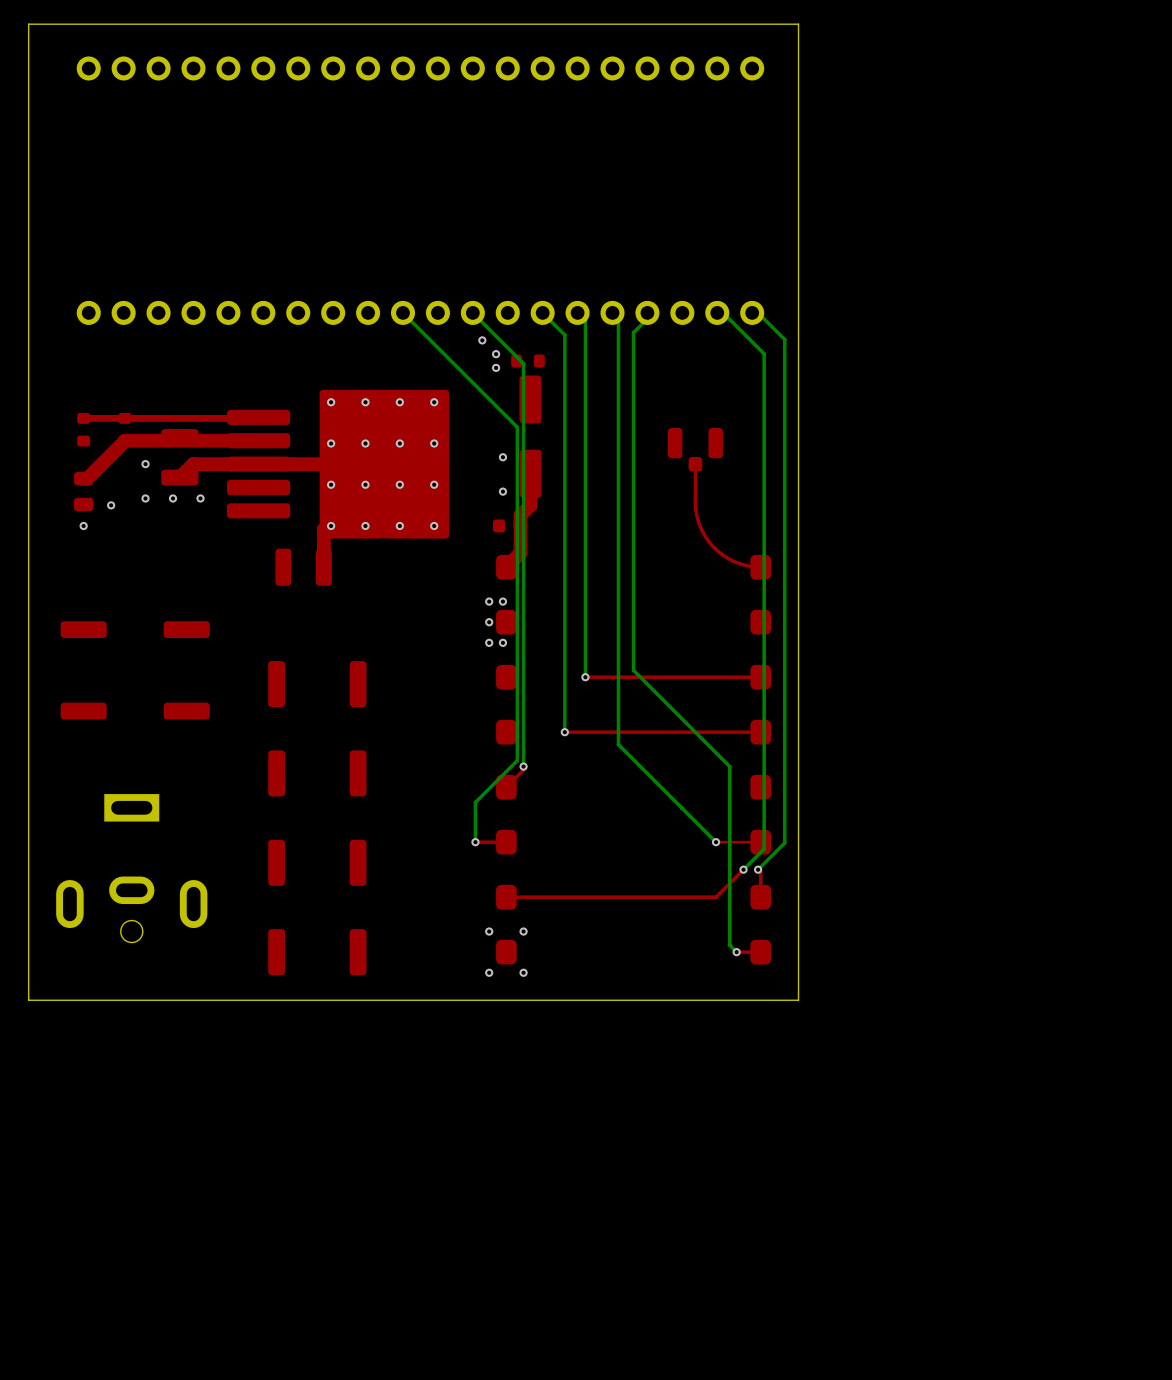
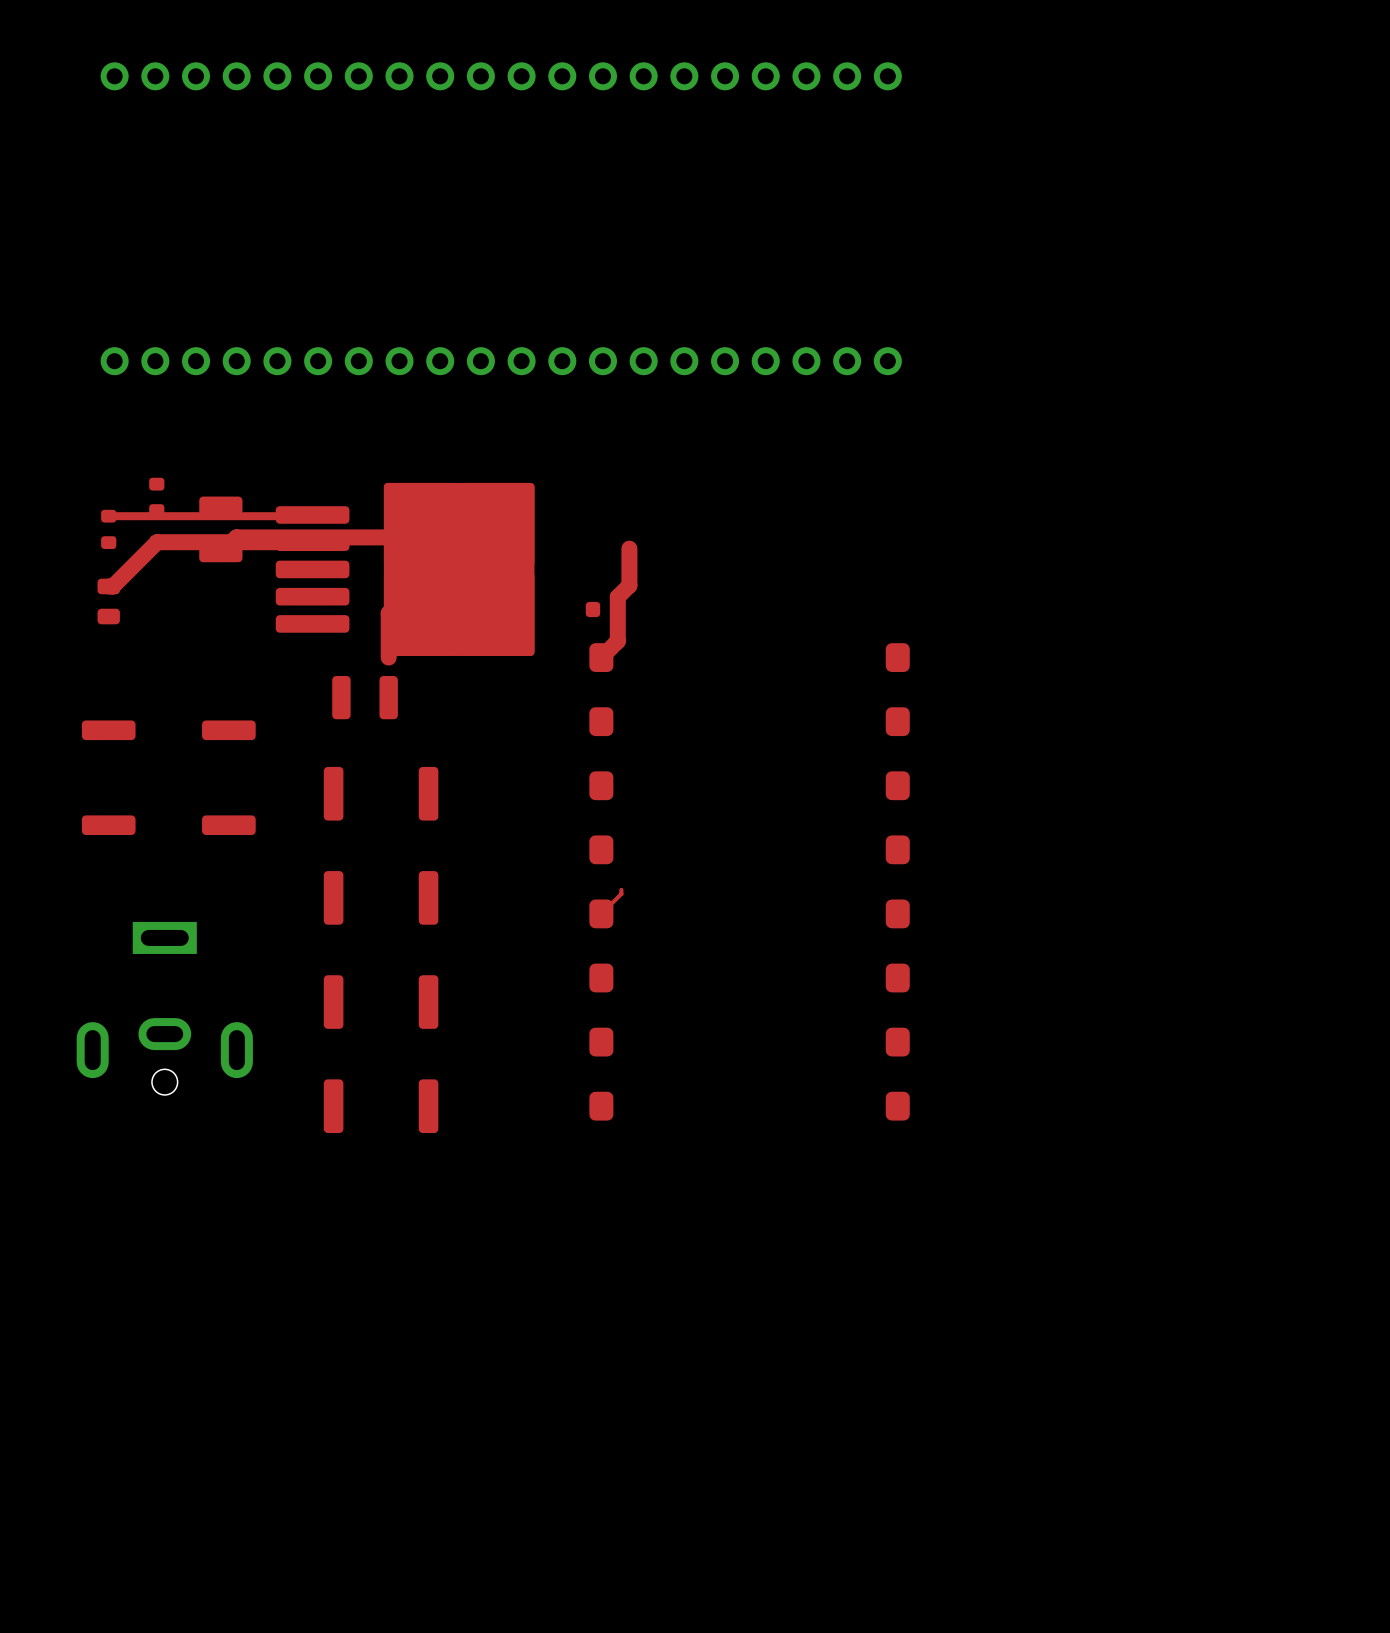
board edge: (798, 24) (798, 1000) (28, 1000) (28, 24) (798, 24) -> none
bottom track: (403, 312) (517, 427) (517, 760) (475, 802) (475, 842) -> none
bottom track: (472, 312) (523, 363) (523, 766) -> none
bottom track: (542, 312) (564, 335) (564, 732) -> none
bottom track: (577, 312) (585, 320) (585, 677) -> none
bottom track: (618, 312) (618, 744) (716, 842) -> none
bottom track: (653, 312) (633, 332) (633, 670) (729, 766) (729, 945) (736, 952) -> none
bottom track: (723, 312) (764, 353) (764, 849) (743, 869) -> none
bottom track: (758, 312) (784, 339) (784, 843) (758, 869) -> none
via: (482, 340) -> none
via: (496, 354) -> none
part: (528, 361) -> none
via: (496, 367) -> none
via: (331, 402) -> none
via: (365, 402) -> none
via: (399, 402) -> none
via: (434, 402) -> none
top track: (258, 417) (83, 418) -> (312, 514) (108, 516)
part position: (83, 429) -> (108, 529)
part: (530, 436) -> none
top track: (258, 440) (125, 440) (87, 478) (83, 478) -> (312, 542) (157, 542) (112, 586) (108, 586)
via: (331, 443) -> none
via: (365, 443) -> none
via: (399, 443) -> none
via: (434, 443) -> none
part: (695, 449) -> none
via: (502, 457) -> none
via: (145, 464) -> none
part position: (337, 464) -> (405, 569)
top track: (695, 464) (695, 509) (699, 523) (705, 536) (714, 548) (725, 557) (739, 563) (760, 567) -> none
via: (331, 484) -> none
via: (365, 484) -> none
via: (399, 484) -> none
via: (434, 484) -> none
part position: (83, 491) -> (108, 601)
via: (502, 491) -> none
via: (145, 498) -> none
via: (173, 498) -> none
via: (200, 498) -> none
via: (111, 505) -> none
via: (83, 525) -> none
via: (331, 525) -> none
via: (365, 525) -> none
via: (399, 525) -> none
via: (434, 525) -> none
part position: (303, 567) -> (365, 697)
via: (489, 601) -> none
via: (502, 601) -> none
via: (489, 622) -> none
via: (489, 642) -> none
via: (502, 642) -> none
via: (585, 677) -> none
top track: (760, 677) (585, 677) -> none
via: (564, 732) -> none
top track: (760, 732) (564, 732) -> none
via: (523, 766) -> none
via: (475, 842) -> none
top track: (506, 842) (475, 842) -> none
via: (716, 842) -> none
top track: (760, 842) (716, 842) -> none
top track: (743, 869) (716, 897) (506, 897) -> none
via: (743, 869) -> none
top track: (758, 869) (760, 872) (760, 897) -> none
via: (758, 869) -> none
via: (489, 931) -> none
via: (523, 931) -> none
via: (736, 952) -> none
top track: (760, 952) (736, 952) -> none
via: (489, 972) -> none
via: (523, 972) -> none

